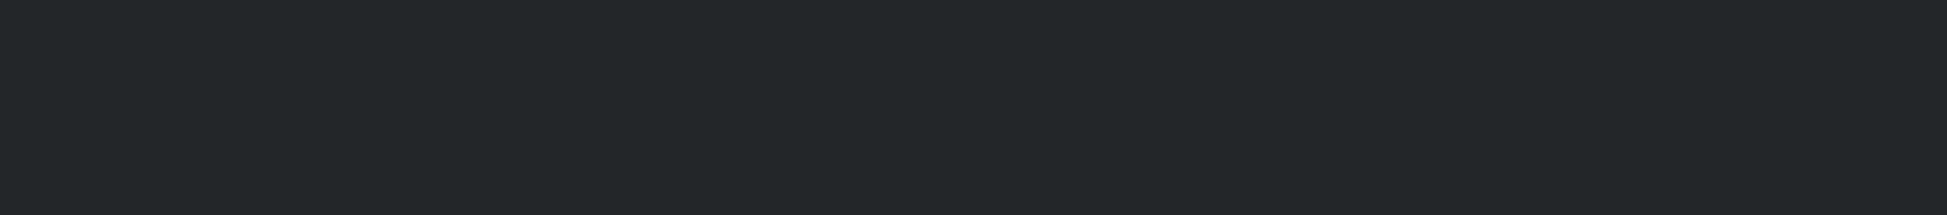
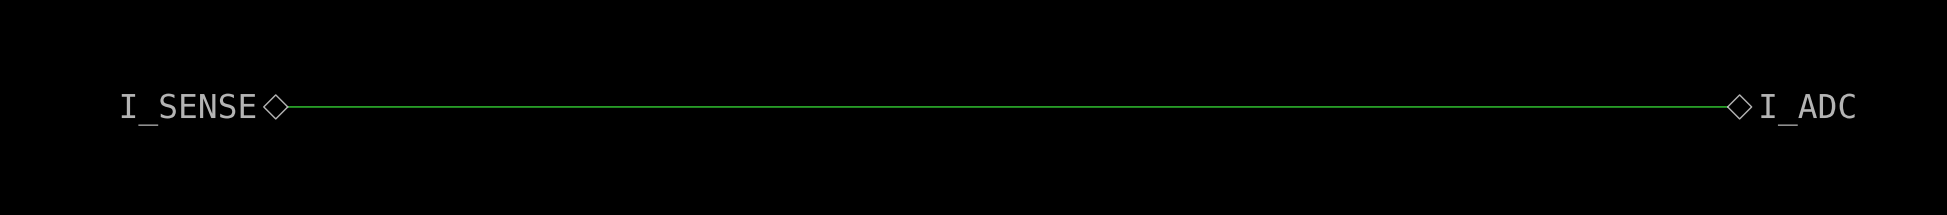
hierarchical label: none -> I_SENSE (188, 109)
wire: none -> (287, 106) (1727, 106)
hierarchical label: none -> I_ADC (1807, 109)

